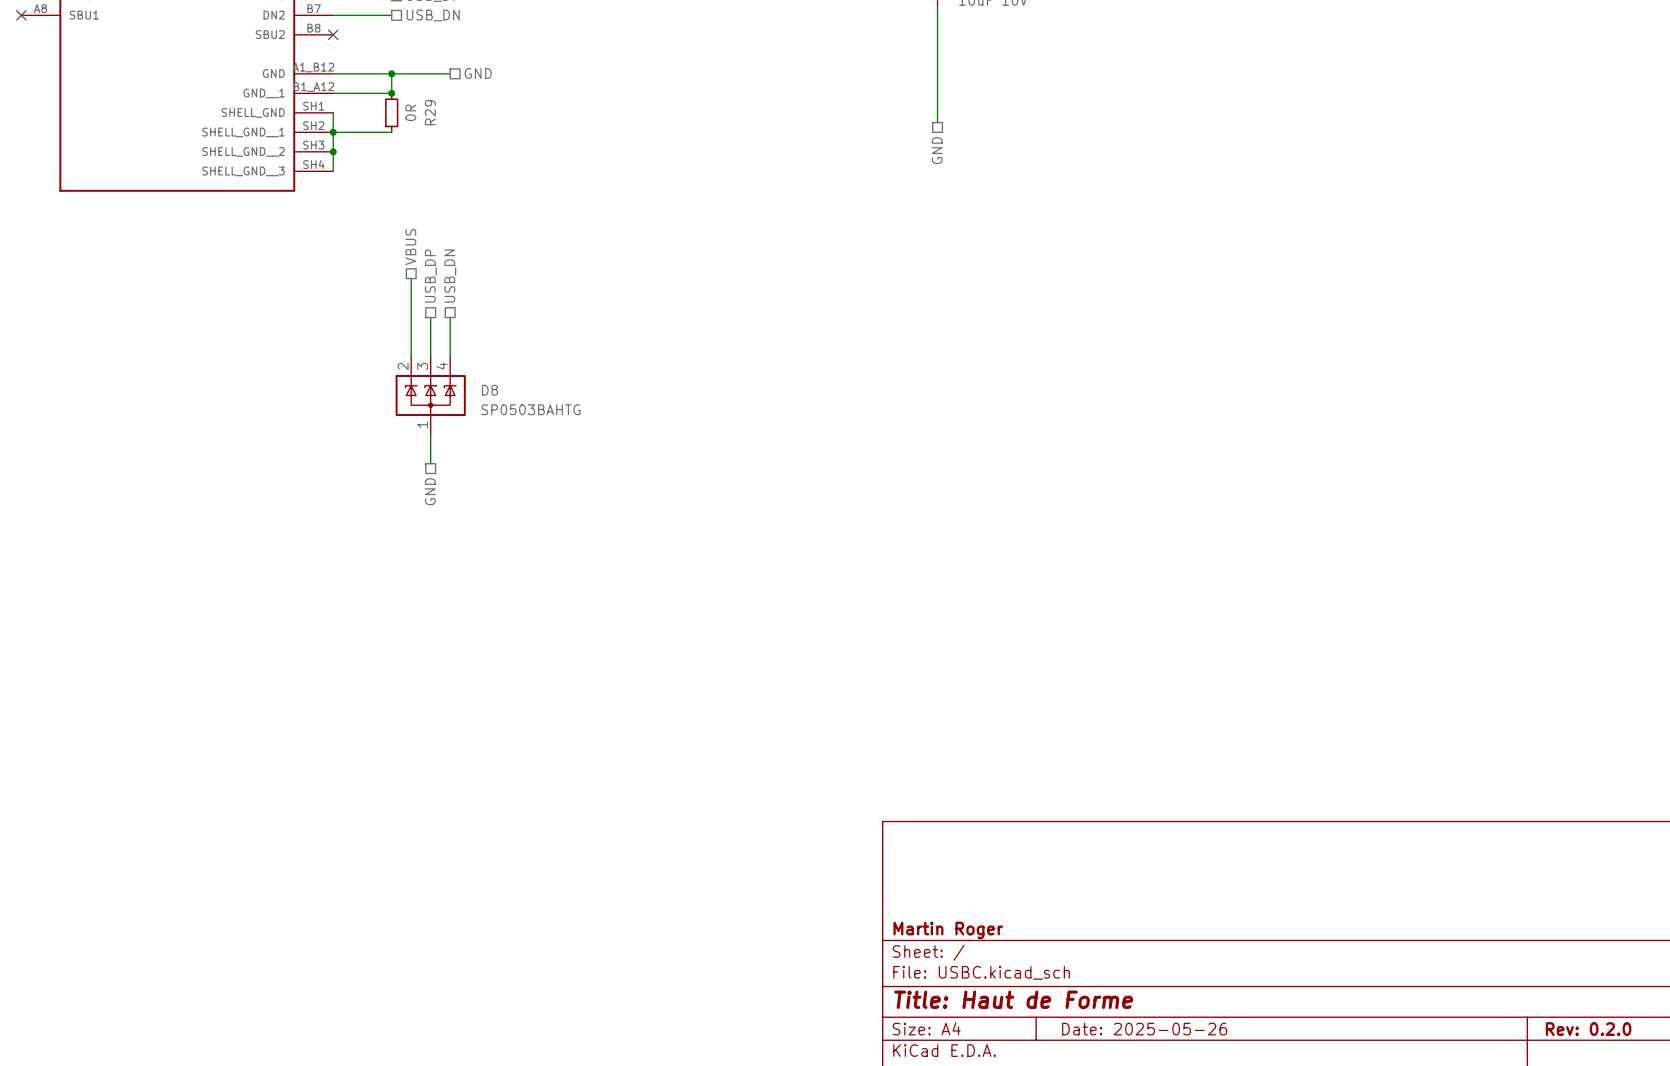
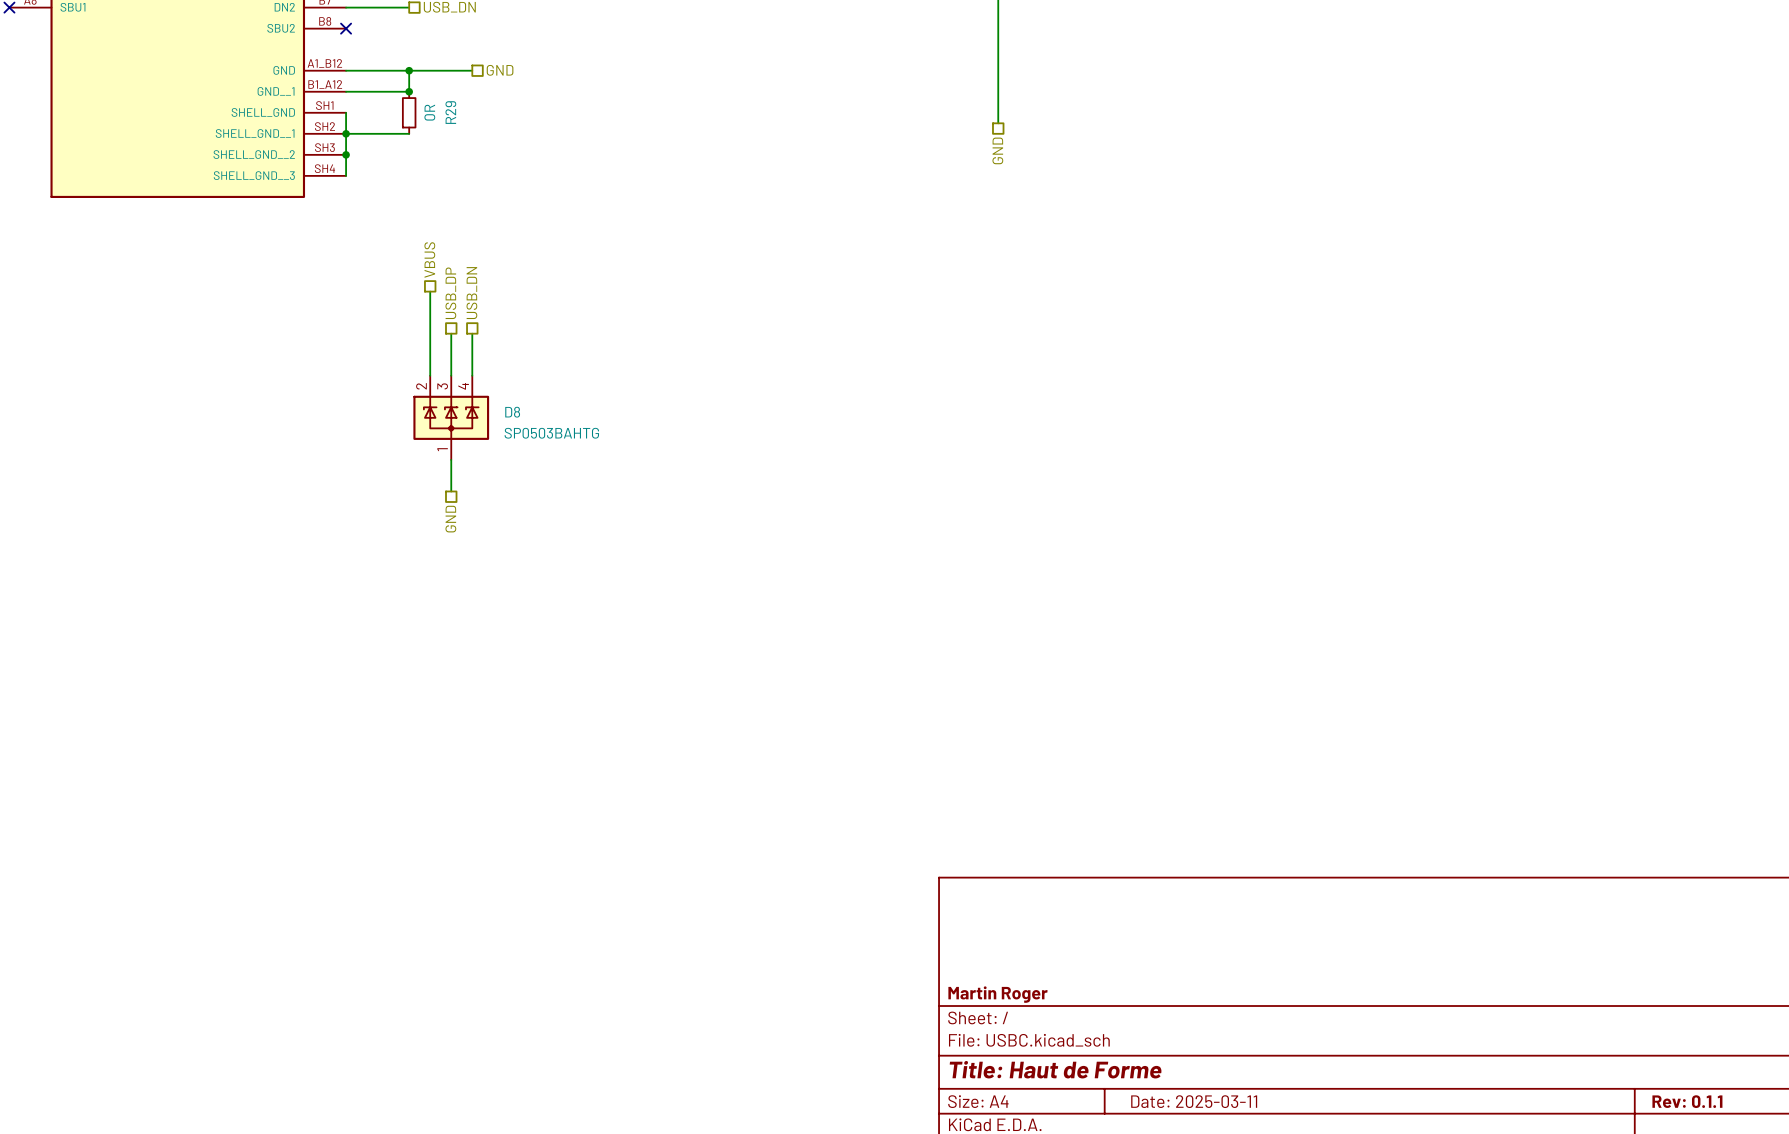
title block: Date: 2025-05-26 (1144, 1029) -> Date: 2025-03-11 (1194, 1101)
title block: Rev: 0.2.0 (1588, 1029) -> Rev: 0.1.1 (1687, 1101)

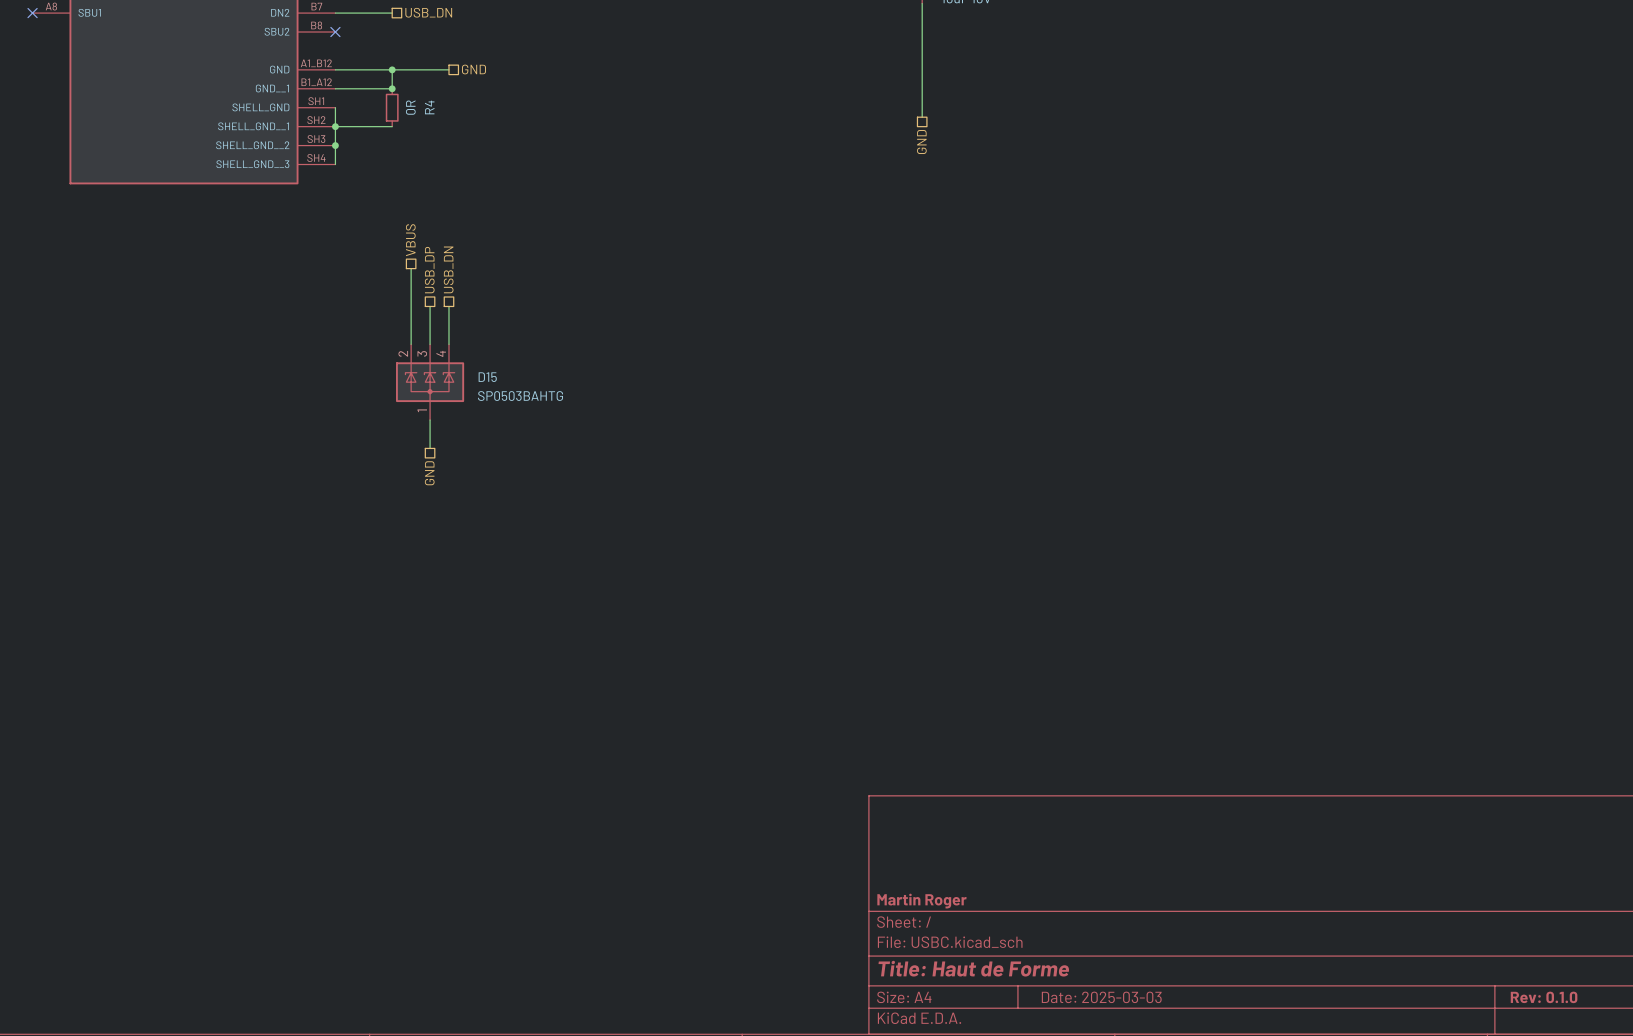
R29 name: R29 (450, 112) -> R4 (429, 107)
D8 name: D8 (512, 412) -> D15 (487, 377)
title block: Date: 2025-03-11 (1194, 1101) -> Date: 2025-03-03 (1101, 997)
title block: Rev: 0.1.1 (1687, 1101) -> Rev: 0.1.0 (1544, 997)

